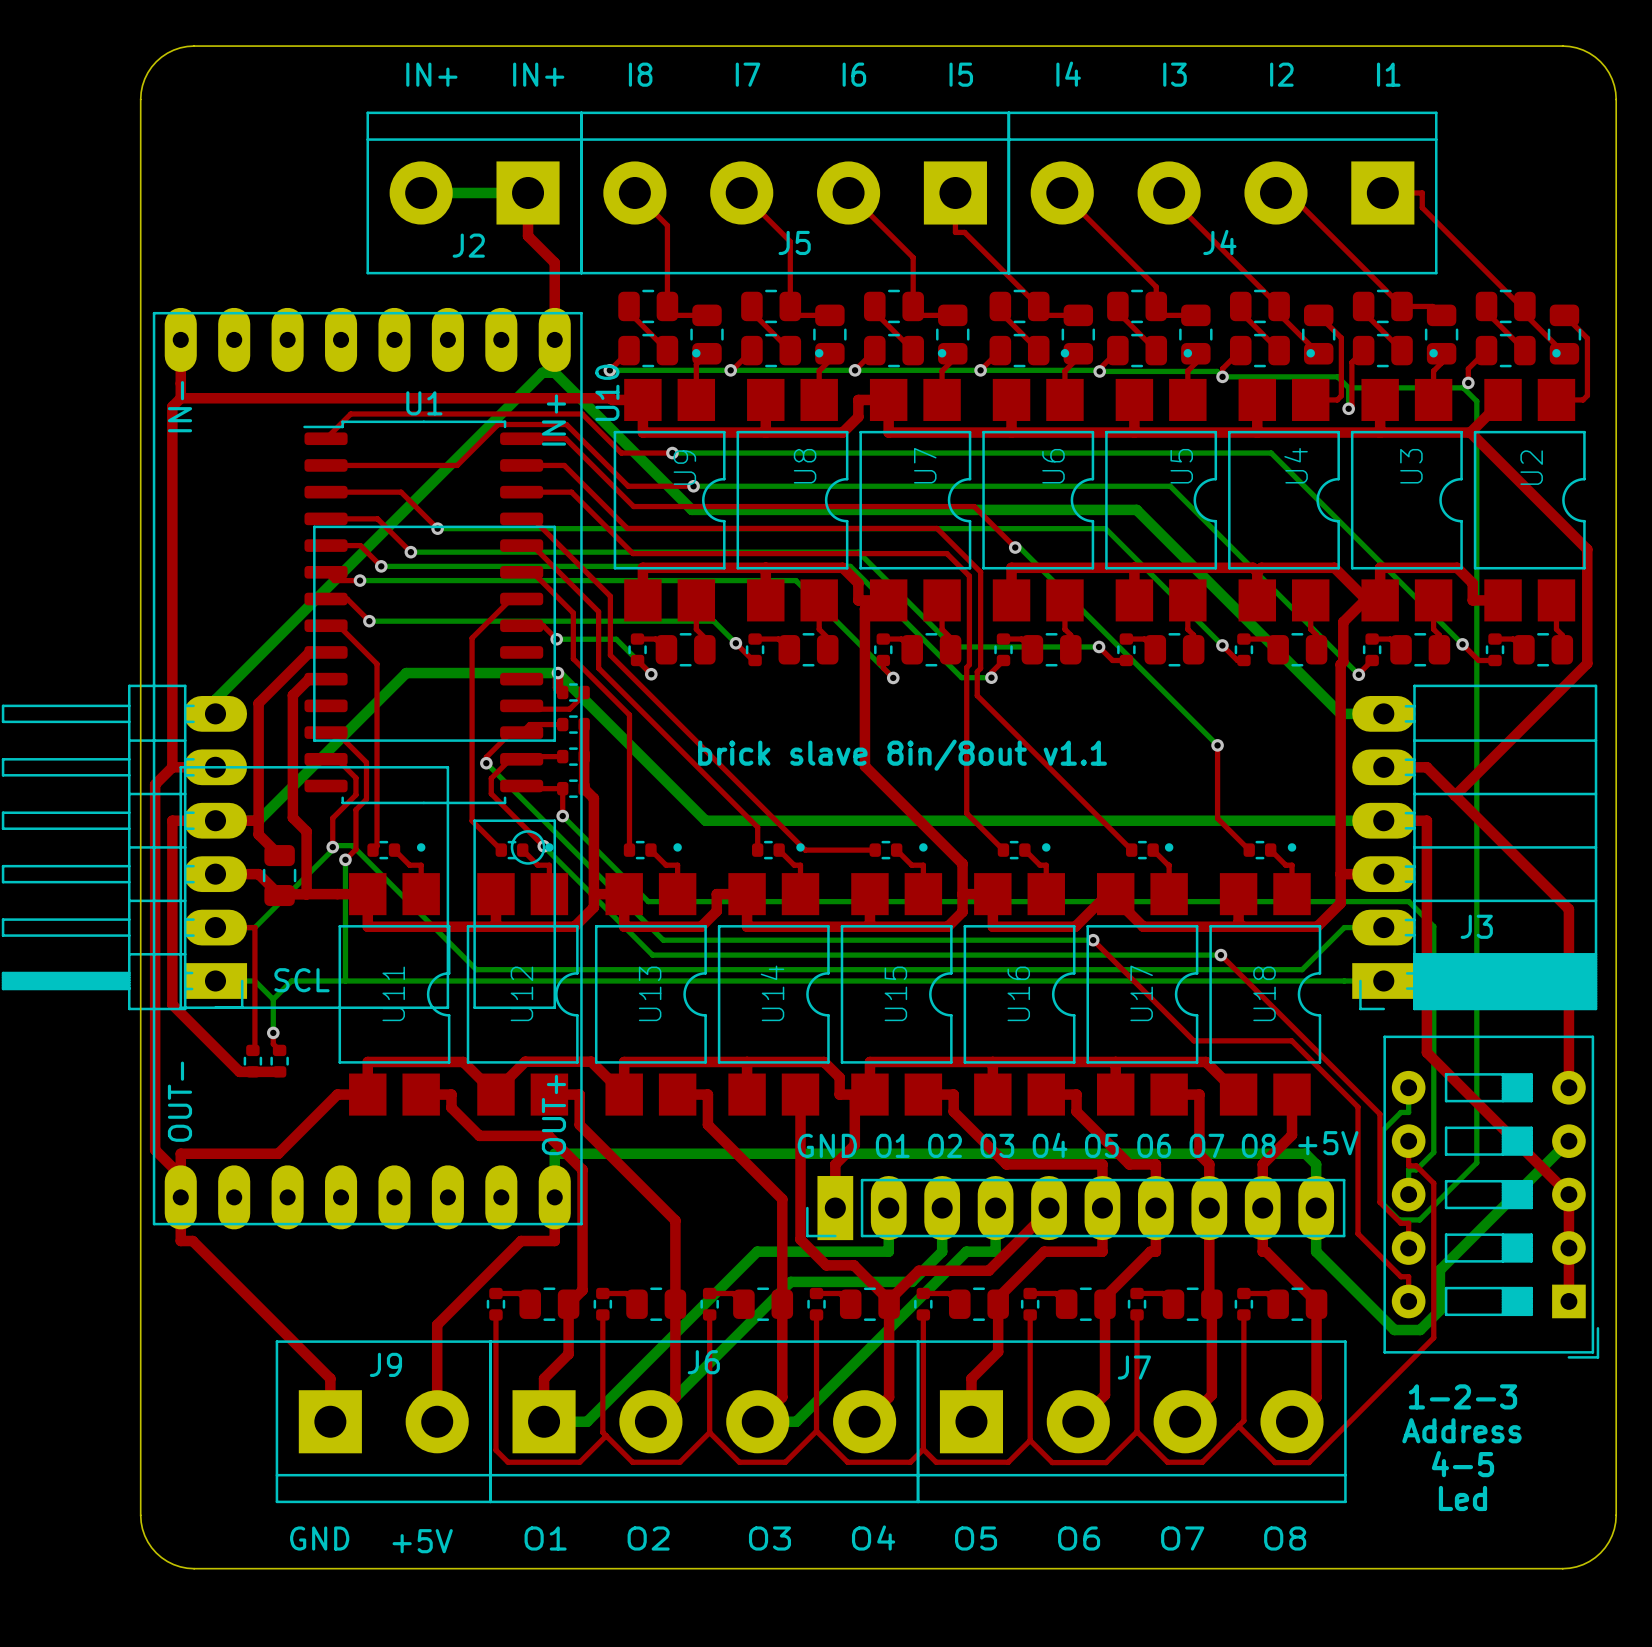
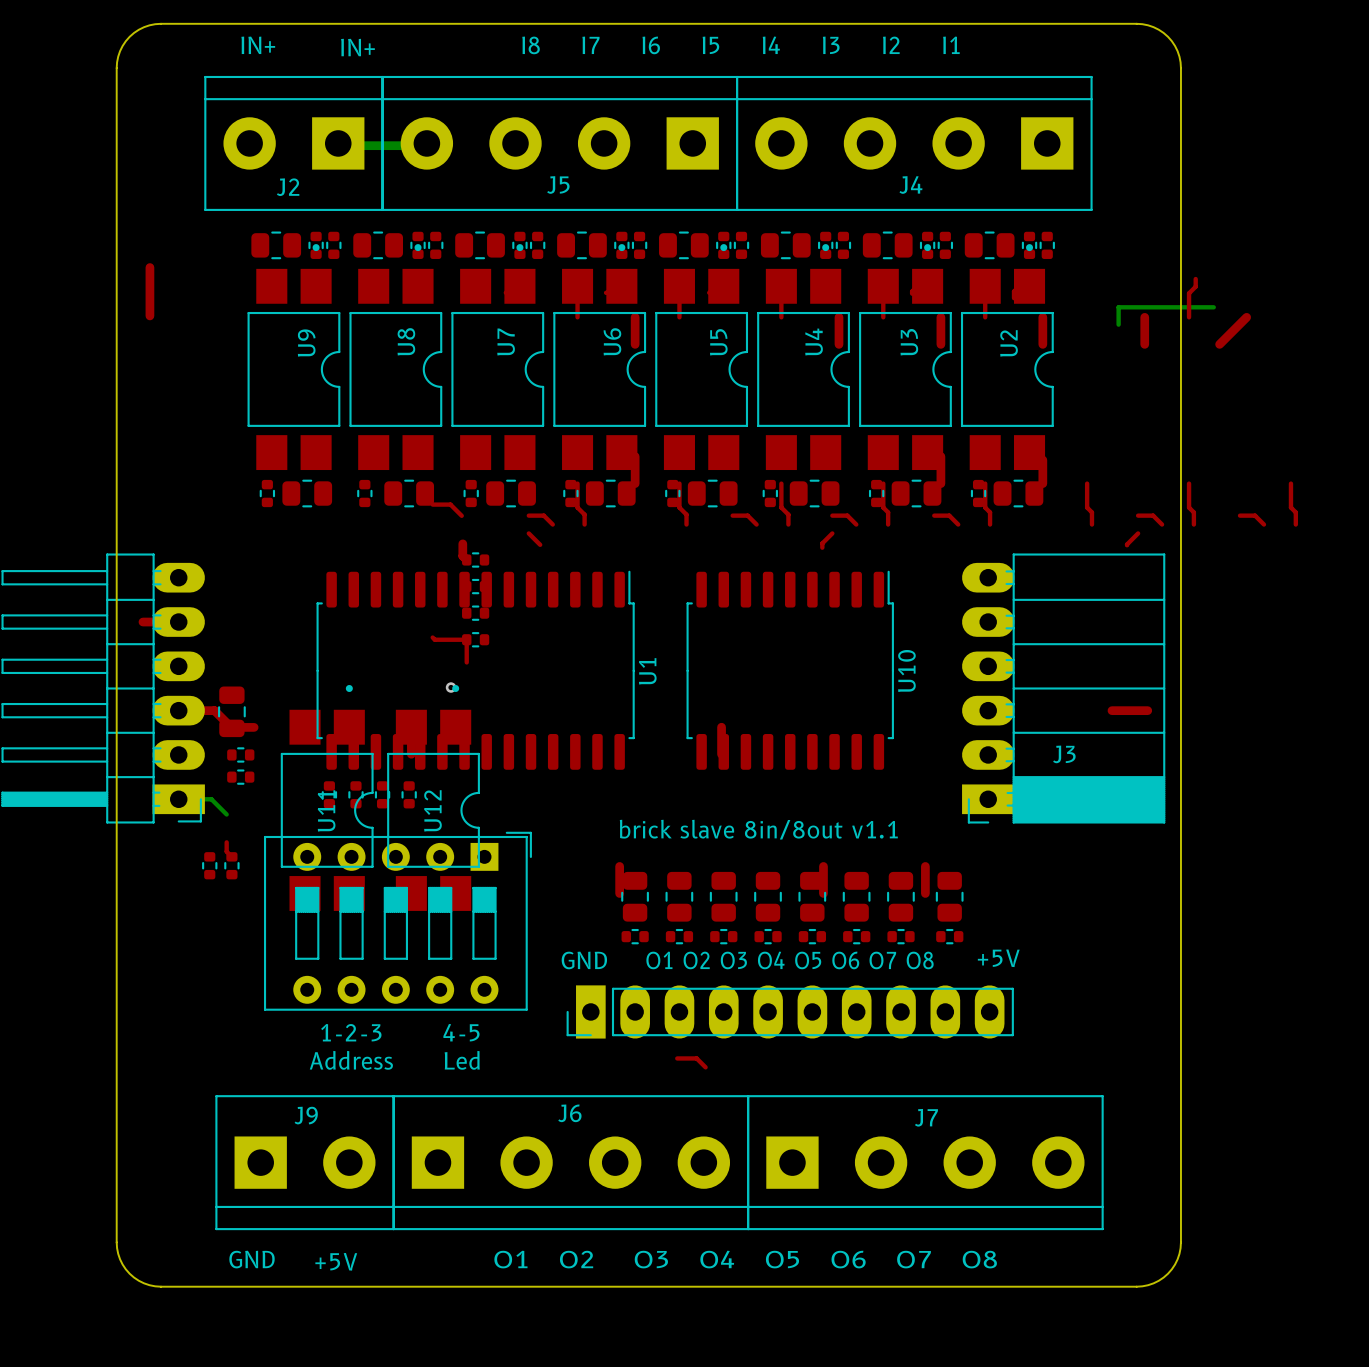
board edge: (1370, 46) (1562, 46) (1576, 47) (1589, 53) (1605, 66) (1614, 85) (1616, 99) (1615, 1522) (1612, 1535) (1600, 1553) (1589, 1561) (1569, 1568) (1370, 1568) -> (1136, 23) (1153, 27) (1168, 36) (1177, 51) (1180, 68) (1180, 1242)
text position: IN+ (538, 74) -> IN+ (258, 45)
text position: I8 I7 I6 I5 I4 I3 I2 I1 (1014, 74) -> I8 I7 I6 I5 I4 I3 I2 I1 (741, 45)
J2 position: (474, 192) -> (293, 143)
top track: (528, 192) (528, 236) (554, 262) (554, 339) -> none
top track: (634, 192) (667, 225) (667, 306) (676, 315) (707, 315) -> none
top track: (741, 192) (790, 241) (790, 306) (799, 315) (829, 315) -> none
J5 position: (795, 192) -> (559, 143)
top track: (848, 192) (913, 257) (913, 306) (922, 315) (952, 315) -> none
top track: (955, 192) (955, 232) (964, 232) (1047, 315) (1078, 315) -> none
top track: (1062, 192) (1156, 286) (1156, 306) (1165, 315) (1195, 315) -> none
top track: (1169, 192) (1169, 196) (1279, 306) (1279, 314) (1318, 353) -> none
J4 position: (1222, 192) -> (914, 143)
top track: (1275, 192) (1288, 192) (1402, 306) (1432, 306) (1441, 315) -> none
top track: (1382, 192) (1422, 192) (1422, 207) (1524, 310) -> none
part footprint: [618, 289, 679, 324] -> [529, 231, 546, 259]
part footprint: [741, 289, 802, 324] -> [631, 231, 648, 259]
part footprint: [864, 289, 924, 324] -> [733, 231, 750, 259]
part footprint: [989, 289, 1050, 324] -> [835, 231, 852, 259]
part footprint: [1107, 289, 1168, 324] -> [937, 231, 954, 259]
part footprint: [1229, 289, 1290, 324] -> [1039, 231, 1055, 259]
top track: (629, 306) (629, 312) (667, 350) -> none
top track: (751, 306) (751, 312) (790, 350) -> none
top track: (874, 306) (874, 312) (913, 350) -> none
top track: (1000, 306) (1000, 312) (1038, 350) -> none
top track: (1117, 306) (1117, 312) (1156, 350) -> none
top track: (1240, 306) (1240, 312) (1279, 350) -> none
top track: (1363, 306) (1363, 312) (1402, 350) -> none
part: (1382, 306) -> none
top track: (1486, 306) (1486, 312) (1524, 350) -> none
part: (1505, 306) -> none
top track: (1524, 306) (1524, 314) (1564, 353) -> none
U10 footprint: [152, 307, 583, 1230] -> [686, 570, 894, 770]
part: none -> (276, 245)
part: none -> (316, 245)
part: none -> (333, 245)
part: none -> (378, 245)
part: none -> (418, 245)
part: none -> (435, 245)
part: none -> (480, 245)
part: none -> (519, 245)
part: none -> (621, 245)
part: none -> (723, 245)
part: none -> (825, 245)
part: none -> (927, 245)
part: none -> (1029, 245)
top track: (1318, 315) (1341, 338) (1341, 395) (1337, 399) (1310, 399) -> none
top track: (1564, 315) (1587, 338) (1587, 395) (1583, 399) (1556, 399) -> none
part rotation: 0° (707, 334) -> 90° clockwise (581, 245)
part rotation: 0° (829, 334) -> 90° clockwise (683, 245)
part rotation: 0° (952, 334) -> 90° clockwise (785, 245)
part rotation: 0° (1078, 334) -> 90° clockwise (887, 245)
part rotation: 0° (1195, 334) -> 90° clockwise (989, 245)
part: (1318, 334) -> none
part: (1441, 334) -> none
part: (1564, 334) -> none
part: (648, 350) -> none
part: (771, 350) -> none
part: (893, 350) -> none
part: (1019, 350) -> none
part: (1137, 350) -> none
part: (1259, 350) -> none
top track: (1363, 350) (1351, 362) (1351, 405) (1348, 408) -> none
part: (1382, 350) -> none
top track: (1486, 350) (1468, 368) (1468, 382) -> none
part: (1505, 350) -> none
bottom track: (609, 370) (1217, 371) (1222, 376) (1337, 376) (1348, 387) -> none
via: (609, 370) -> none
via: (730, 370) -> none
via: (855, 370) -> none
via: (980, 370) -> none
via: (1099, 371) -> none
bottom track: (554, 372) (691, 509) (1136, 509) (1340, 713) (1383, 713) -> none
bottom track: (554, 372) (542, 372) (215, 699) (215, 713) -> none
via: (1222, 376) -> none
bottom track: (1468, 382) (1463, 387) (1476, 401) (1476, 1162) (1419, 1219) (1398, 1219) (1383, 1204) (1383, 1130) (1400, 1112) (1408, 1112) (1408, 1087) -> none
via: (1468, 382) -> none
U10 name position: U10 (607, 392) -> U10 (906, 671)
via: (1348, 408) -> none
top track: (326, 438) (350, 413) (582, 413) (621, 453) (672, 453) -> none
top track: (521, 438) (565, 438) (633, 506) (974, 506) (1015, 547) -> none
bottom track: (672, 453) (1271, 453) (1462, 644) -> none
via: (672, 453) -> none
top track: (326, 465) (457, 465) (498, 424) (566, 424) (628, 486) (693, 486) -> none
top track: (521, 465) (564, 465) (627, 528) (937, 528) (980, 572) (980, 668) (977, 671) (977, 695) (1131, 850) -> none
U9 position: (669, 485) -> (293, 357)
U8 position: (792, 485) -> (395, 357)
U7 position: (915, 485) -> (497, 357)
U6 position: (1038, 485) -> (599, 357)
U5 position: (1161, 485) -> (701, 357)
U4 position: (1284, 485) -> (803, 357)
U3 position: (1406, 485) -> (905, 357)
U2 position: (1529, 485) -> (1007, 357)
bottom track: (693, 486) (1170, 486) (1358, 674) -> none
via: (693, 486) -> none
top track: (326, 492) (401, 492) (437, 528) -> none
top track: (521, 492) (571, 492) (632, 553) (946, 553) (969, 576) (969, 664) (966, 667) (966, 813) (1003, 850) -> none
top track: (326, 518) (377, 518) (410, 552) -> none
top track: (521, 518) (532, 518) (610, 596) (610, 655) (805, 850) (875, 850) -> none
bottom track: (437, 528) (1105, 528) (1222, 645) -> none
via: (437, 528) -> none
top track: (326, 545) (360, 545) (381, 566) -> none
top track: (521, 545) (532, 545) (598, 611) (598, 668) (757, 827) (757, 850) -> none
bottom track: (1015, 547) (1019, 547) (1217, 745) -> none
via: (1015, 547) -> none
bottom track: (410, 552) (858, 552) (953, 646) (1099, 646) -> none
via: (410, 552) -> none
bottom track: (381, 566) (850, 566) (961, 677) (991, 677) -> none
via: (381, 566) -> none
top track: (326, 572) (334, 580) (360, 580) -> none
top track: (521, 572) (532, 572) (573, 613) (573, 658) (629, 714) (629, 850) -> none
bottom track: (360, 580) (795, 580) (893, 677) -> none
via: (360, 580) -> none
top track: (326, 599) (347, 599) (369, 621) -> none
top track: (521, 599) (511, 599) (472, 638) (472, 820) (501, 850) -> none
top track: (642, 600) (642, 567) (842, 567) (858, 583) (858, 600) (888, 600) -> none
top track: (873, 600) (864, 608) (864, 766) (962, 863) (962, 912) (947, 926) (747, 926) (747, 894) (716, 894) (716, 911) (701, 926) (624, 926) (624, 894) (593, 894) -> none
top track: (1011, 600) (1011, 567) (1253, 567) (1257, 572) (1261, 567) (1334, 567) (1365, 600) -> none
top track: (1365, 600) (1343, 622) (1343, 661) (1340, 664) (1340, 903) (1317, 926) (1242, 926) (1238, 922) -> none
top track: (1365, 600) (1380, 600) (1380, 567) (1457, 567) (1472, 583) (1472, 600) (1503, 600) -> none
part: none -> (267, 493)
part: none -> (307, 493)
U1 rotation: 0° (423, 612) -> 90° clockwise (475, 670)
U1 position: (423, 612) -> (475, 670)
part: none -> (364, 493)
part: none -> (409, 493)
part: none -> (471, 493)
part: none -> (511, 493)
part: none -> (570, 493)
part: none -> (610, 493)
part: none -> (672, 493)
part: none -> (712, 493)
part: none -> (770, 493)
part: none -> (814, 493)
part: none -> (876, 493)
part: none -> (916, 493)
part: none -> (978, 493)
part: none -> (1018, 493)
bottom track: (369, 621) (713, 621) (735, 643) -> none
via: (369, 621) -> none
top track: (326, 625) (338, 625) (377, 664) (377, 846) (373, 850) -> none
bottom track: (556, 639) (616, 639) (651, 674) -> none
via: (556, 639) -> none
top track: (755, 639) (778, 639) (789, 649) -> none
top track: (1243, 639) (1267, 639) (1278, 649) -> none
top track: (735, 643) (755, 660) -> none
via: (735, 643) -> none
top track: (1462, 644) (1478, 660) (1495, 660) -> none
via: (1462, 644) -> none
top track: (1222, 645) (1237, 660) (1243, 660) -> none
via: (1222, 645) -> none
top track: (1099, 646) (1112, 660) (1126, 660) -> none
via: (1099, 646) -> none
part: (637, 649) -> none
part: (685, 649) -> none
part: (755, 649) -> none
part: (808, 649) -> none
part: (883, 649) -> none
part: (931, 649) -> none
part: (1003, 649) -> none
part: (1051, 649) -> none
part: (1126, 649) -> none
part: (1174, 649) -> none
part: (1243, 649) -> none
part: (1297, 649) -> none
part: (1372, 649) -> none
part: (1420, 649) -> none
part: (1495, 649) -> none
part: (1543, 649) -> none
top track: (326, 652) (309, 652) (258, 703) (258, 834) (279, 855) -> none
top track: (883, 660) (883, 667) (893, 677) -> none
via: (557, 673) -> none
via: (651, 674) -> none
via: (1358, 674) -> none
via: (893, 677) -> none
via: (991, 677) -> none
top track: (326, 679) (309, 679) (292, 695) (292, 817) (306, 831) (306, 894) (367, 894) (367, 926) (574, 926) (593, 907) (593, 798) (584, 788) (584, 724) -> none
top track: (584, 692) (569, 709) (525, 709) (521, 705) -> none
top track: (562, 724) (529, 724) (521, 732) (511, 732) (486, 757) (486, 763) -> none
top track: (326, 732) (336, 732) (366, 762) (366, 799) (355, 809) (355, 849) (345, 859) -> none
top track: (1217, 745) (1217, 818) (1249, 850) -> none
via: (1217, 745) -> none
text position: brick slave 8in/8out v1.1 (902, 755) -> brick slave 8in/8out v1.1 (758, 829)
top track: (562, 756) (524, 756) (521, 759) (510, 759) (491, 778) (491, 793) (543, 846) -> none
top track: (326, 759) (337, 759) (355, 778) (355, 794) (332, 818) (332, 847) -> none
bottom track: (486, 763) (663, 940) (1093, 940) -> none
via: (486, 763) -> none
top track: (1383, 767) (1426, 767) (1568, 909) (1568, 1087) -> none
top track: (1455, 795) (1587, 663) (1587, 549) (1470, 432) (888, 432) (888, 399) (858, 399) (858, 416) (842, 432) (642, 432) (642, 399) (612, 399) (610, 398) (180, 398) (172, 406) (172, 767) (155, 784) (155, 1149) (180, 1175) -> none
bottom track: (562, 816) (648, 901) (1408, 901) (1433, 926) (1433, 1152) (1416, 1169) (1408, 1169) (1408, 1194) -> none
via: (562, 816) -> none
bottom track: (215, 820) (258, 820) (406, 673) (557, 673) (705, 820) (1383, 820) -> none
top track: (258, 820) (172, 820) (172, 1004) (239, 1071) (279, 1071) -> none
top track: (1383, 820) (1426, 820) (1426, 1052) (1568, 1194) (1568, 1301) -> none
bottom track: (543, 846) (652, 955) (1220, 955) -> none
via: (332, 847) -> none
J3 position: (1474, 847) -> (1063, 688)
part: (383, 850) -> none
top track: (394, 850) (409, 865) (421, 865) (421, 894) -> none
part: (512, 850) -> none
top track: (522, 850) (537, 865) (549, 865) (549, 894) -> none
part: (640, 850) -> none
top track: (650, 850) (666, 865) (677, 865) (677, 894) -> none
part: (768, 850) -> none
top track: (779, 850) (794, 865) (800, 865) (800, 894) -> none
part: (885, 850) -> none
top track: (896, 850) (911, 865) (923, 865) (923, 894) -> none
part: (1014, 850) -> none
top track: (1024, 850) (1039, 865) (1046, 865) (1046, 894) -> none
part: (1142, 850) -> none
top track: (1153, 850) (1169, 865) (1169, 894) -> none
part: (1259, 850) -> none
top track: (1270, 850) (1285, 865) (1292, 865) (1292, 894) -> none
bottom track: (345, 859) (345, 981) -> none
via: (345, 859) -> none
top track: (962, 894) (992, 894) (992, 926) (1075, 926) (1102, 899) (1115, 899) -> none
top track: (1238, 894) (1238, 926) (1143, 926) (1115, 899) -> none
top track: (215, 927) (254, 927) (254, 1048) (252, 1050) -> none
bottom track: (215, 927) (254, 927) (332, 849) (334, 845) (352, 845) (476, 969) (1302, 969) (1344, 927) (1383, 927) -> none
part: none -> (240, 754)
top track: (1093, 940) (1193, 1040) (1291, 1040) (1358, 1107) (1358, 1233) (1400, 1276) (1408, 1276) (1408, 1301) -> none
via: (1093, 940) -> none
part: none -> (240, 777)
top track: (1220, 955) (1379, 1114) (1379, 1202) (1400, 1223) (1408, 1223) (1408, 1248) -> none
via: (1220, 955) -> none
part: none -> (329, 794)
part: none -> (355, 794)
part: none -> (382, 794)
part: none -> (409, 794)
U13: (650, 979) -> none
U14: (773, 979) -> none
U15: (896, 979) -> none
U16: (1019, 979) -> none
U17: (1142, 979) -> none
U18: (1265, 979) -> none
text: SCL (301, 980) -> none
bottom track: (1383, 981) (291, 981) (273, 999) (273, 1032) -> none
via: (273, 1032) -> none
top track: (494, 1092) (525, 1061) (591, 1061) (624, 1094) (624, 1061) (824, 1061) (839, 1077) (839, 1094) (869, 1094) (869, 1061) (1205, 1061) (1238, 1094) -> none
top track: (421, 1094) (451, 1094) (451, 1107) (479, 1135) (548, 1135) (582, 1169) (582, 1290) (568, 1304) (568, 1354) (544, 1378) (544, 1421) -> none
top track: (495, 1094) (463, 1061) (367, 1061) (367, 1094) (337, 1094) (278, 1153) (180, 1153) (180, 1241) (192, 1241) (330, 1378) (330, 1421) -> none
top track: (549, 1094) (579, 1094) (579, 1124) (675, 1220) (675, 1397) (650, 1421) -> none
top track: (677, 1094) (707, 1094) (707, 1124) (782, 1199) (782, 1397) (757, 1421) -> none
top track: (800, 1094) (800, 1239) (826, 1265) (853, 1265) (889, 1300) -> none
top track: (854, 1094) (854, 1144) (835, 1164) (835, 1208) -> none
top track: (923, 1094) (953, 1094) (953, 1111) (1006, 1164) (1102, 1164) (1102, 1251) (1044, 1251) (998, 1297) (998, 1351) (971, 1378) (971, 1421) -> none
top track: (1046, 1094) (1076, 1094) (1076, 1111) (1129, 1164) (1155, 1164) (1155, 1251) (1150, 1251) (1105, 1297) (1105, 1395) (1078, 1421) -> none
top track: (1169, 1094) (1199, 1094) (1199, 1154) (1209, 1164) (1209, 1301) (1211, 1304) (1211, 1395) (1185, 1421) -> none
top track: (1292, 1094) (1292, 1135) (1262, 1164) (1262, 1251) (1266, 1251) (1316, 1302) (1316, 1397) (1292, 1421) -> none
part: none -> (635, 896)
part: none -> (679, 896)
part: none -> (723, 896)
part: none -> (768, 896)
part: none -> (812, 896)
part: none -> (856, 896)
part: none -> (900, 896)
part: none -> (949, 896)
part: none -> (397, 921)
top track: (1408, 1141) (1408, 1165) (1416, 1165) (1433, 1183) (1433, 1337) (1308, 1462) (1275, 1462) (1238, 1426) -> none
bottom track: (1568, 1141) (1439, 1270) (1439, 1310) (1420, 1330) (1394, 1330) (1316, 1251) (1316, 1164) (1305, 1153) (554, 1153) (554, 1197) -> none
text position: +5V (1328, 1143) -> +5V (998, 958)
text position: GND (827, 1145) -> GND (584, 960)
text position: O1 O2 O3 O4 O5 O6 O7 O8 (1075, 1145) -> O1 O2 O3 O4 O5 O6 O7 O8 (790, 960)
part: none -> (635, 936)
part: none -> (679, 936)
part: none -> (723, 936)
part: none -> (768, 936)
part: none -> (812, 936)
part: none -> (856, 936)
part: none -> (901, 936)
part: none -> (949, 936)
top track: (554, 1197) (554, 1241) (521, 1241) (437, 1324) (437, 1421) -> none
part: (1491, 1197) -> none
bottom track: (888, 1208) (888, 1251) (757, 1251) (587, 1421) (544, 1421) -> none
bottom track: (942, 1208) (942, 1251) (911, 1281) (790, 1281) (650, 1421) -> none
bottom track: (995, 1208) (995, 1251) (966, 1251) (796, 1421) (757, 1421) -> none
top track: (1049, 1208) (1049, 1210) (988, 1270) (918, 1270) (889, 1300) -> none
part position: (1075, 1208) -> (790, 1011)
text: none -> 4-5 (461, 1032)
text: none -> 1-2-3 (351, 1032)
top track: (495, 1293) (519, 1293) (530, 1304) -> none
top track: (602, 1293) (626, 1293) (637, 1304) -> none
top track: (709, 1293) (733, 1293) (743, 1304) -> none
top track: (923, 1293) (949, 1293) (959, 1304) -> none
top track: (1030, 1293) (1055, 1293) (1066, 1304) -> none
top track: (1137, 1293) (1162, 1293) (1173, 1304) -> none
top track: (1243, 1293) (1267, 1293) (1278, 1304) -> none
text: none -> Address (351, 1060)
text: none -> Led (462, 1060)
top track: (889, 1300) (889, 1397) (864, 1421) -> none
part: (495, 1304) -> none
part: (549, 1304) -> none
part: (602, 1304) -> none
part: (656, 1304) -> none
part: (709, 1304) -> none
part: (763, 1304) -> none
part: (816, 1304) -> none
part: (869, 1304) -> none
part: (923, 1304) -> none
part: (978, 1304) -> none
part: (1030, 1304) -> none
part: (1085, 1304) -> none
part: (1137, 1304) -> none
part: (1192, 1304) -> none
part: (1243, 1304) -> none
part: (1297, 1304) -> none
top track: (495, 1314) (495, 1450) (508, 1462) (579, 1462) (606, 1435) -> none
top track: (602, 1314) (602, 1432) (632, 1462) (679, 1462) (709, 1432) -> none
top track: (709, 1314) (709, 1432) -> none
top track: (816, 1314) (816, 1431) -> none
top track: (923, 1314) (923, 1449) -> none
top track: (1030, 1314) (1030, 1440) -> none
top track: (1137, 1314) (1137, 1431) -> none
top track: (1243, 1314) (1243, 1420) (1202, 1462) (1167, 1462) (1137, 1431) -> none
text: 1-2-3 (1462, 1396) -> none
J9 position: (383, 1421) -> (305, 1162)
J6 position: (704, 1421) -> (570, 1162)
J7 position: (1131, 1421) -> (925, 1162)
text: Address (1461, 1430) -> none
top track: (816, 1431) (785, 1462) (739, 1462) (709, 1432) -> none
top track: (816, 1431) (847, 1462) (910, 1462) (923, 1449) -> none
top track: (1137, 1431) (1106, 1462) (1052, 1462) (1030, 1440) -> none
top track: (1030, 1440) (1008, 1462) (936, 1462) (923, 1449) -> none
text: 4-5 (1462, 1464) -> none
text: Led (1462, 1498) -> none
board edge: none -> (1180, 1242) (1177, 1259) (1168, 1273) (1153, 1283) (1136, 1286)
text position: GND (319, 1538) -> GND (252, 1259)
text position: O1 O2 O3 O4 O5 O6 O7 O8 (915, 1538) -> O1 O2 O3 O4 O5 O6 O7 O8 (745, 1259)
text position: +5V (422, 1541) -> +5V (336, 1261)

